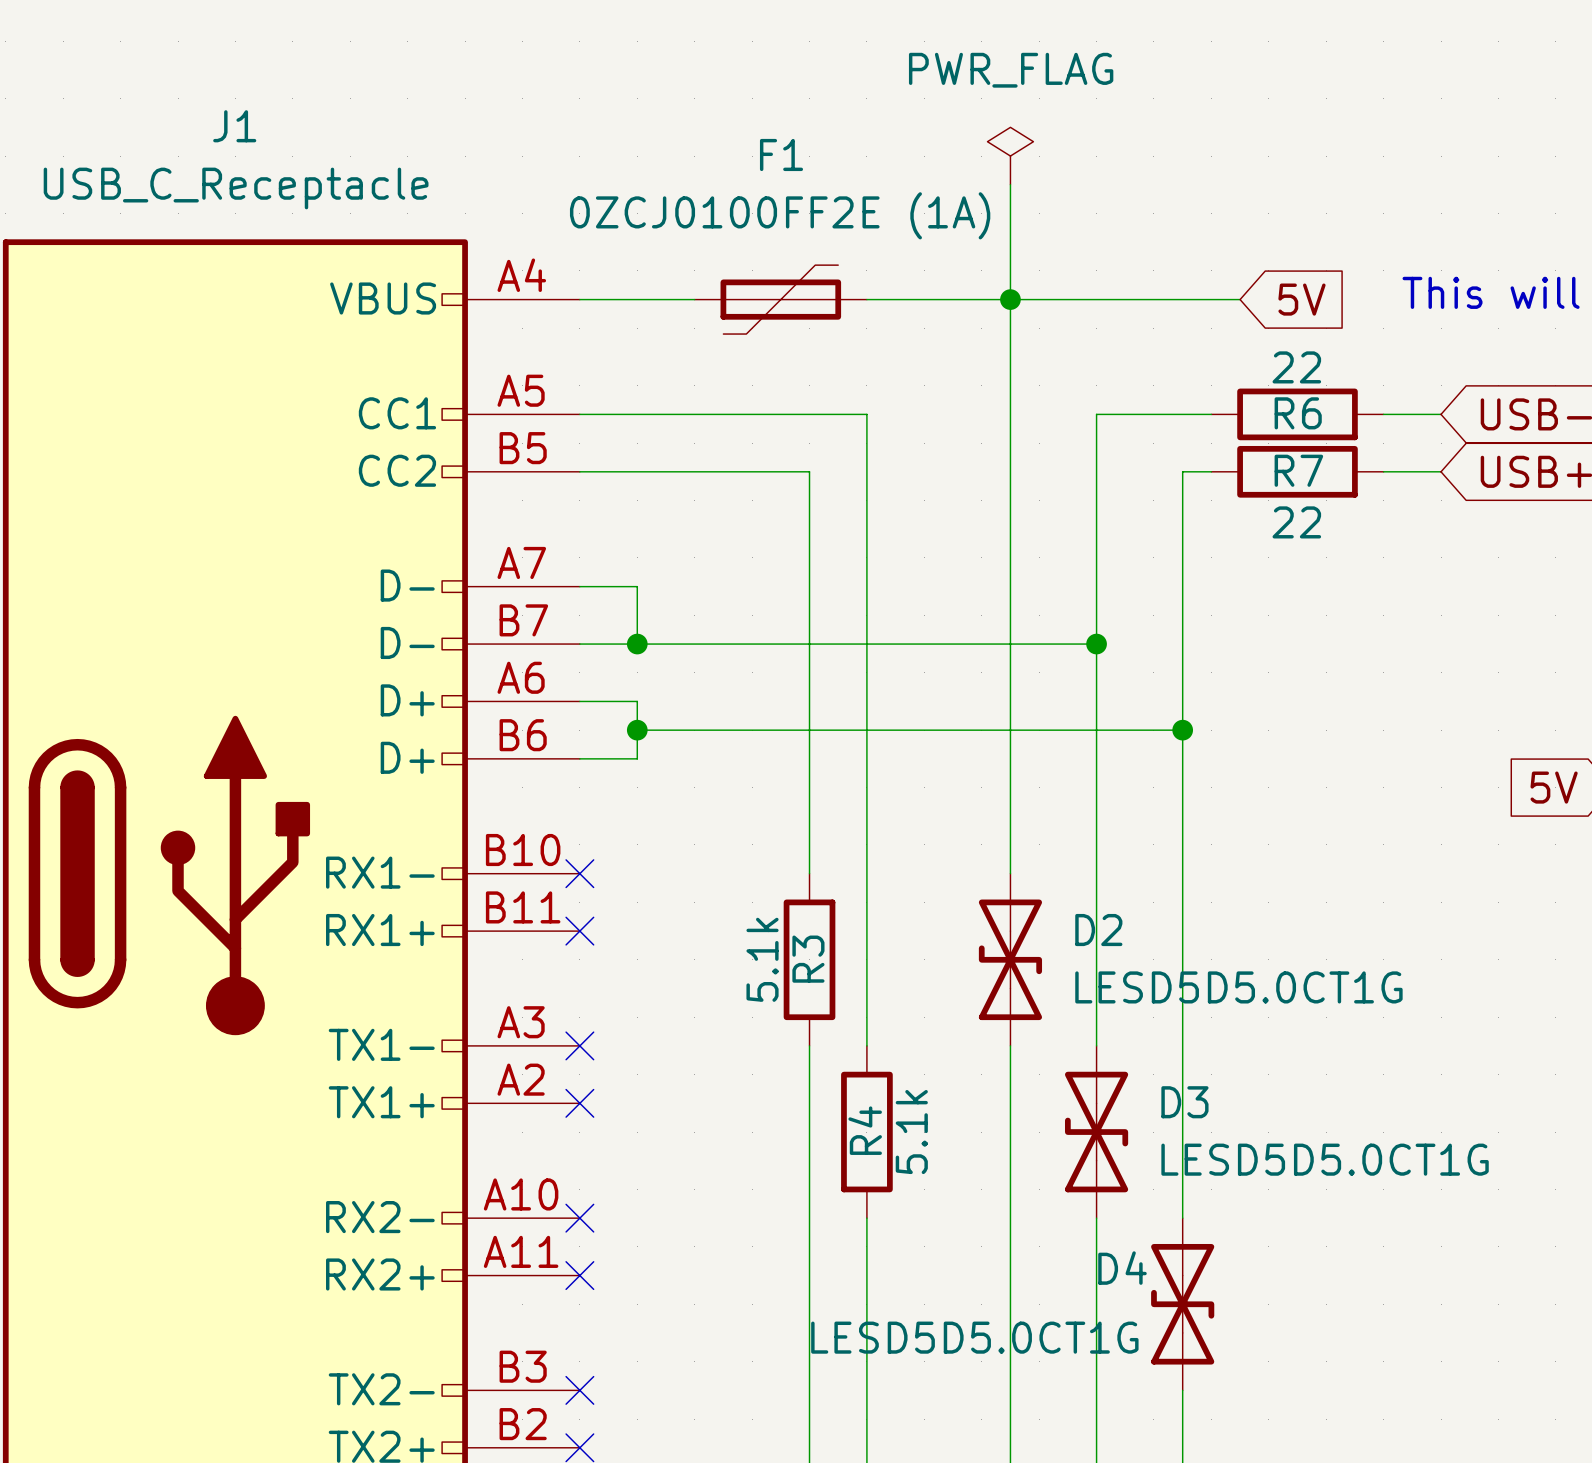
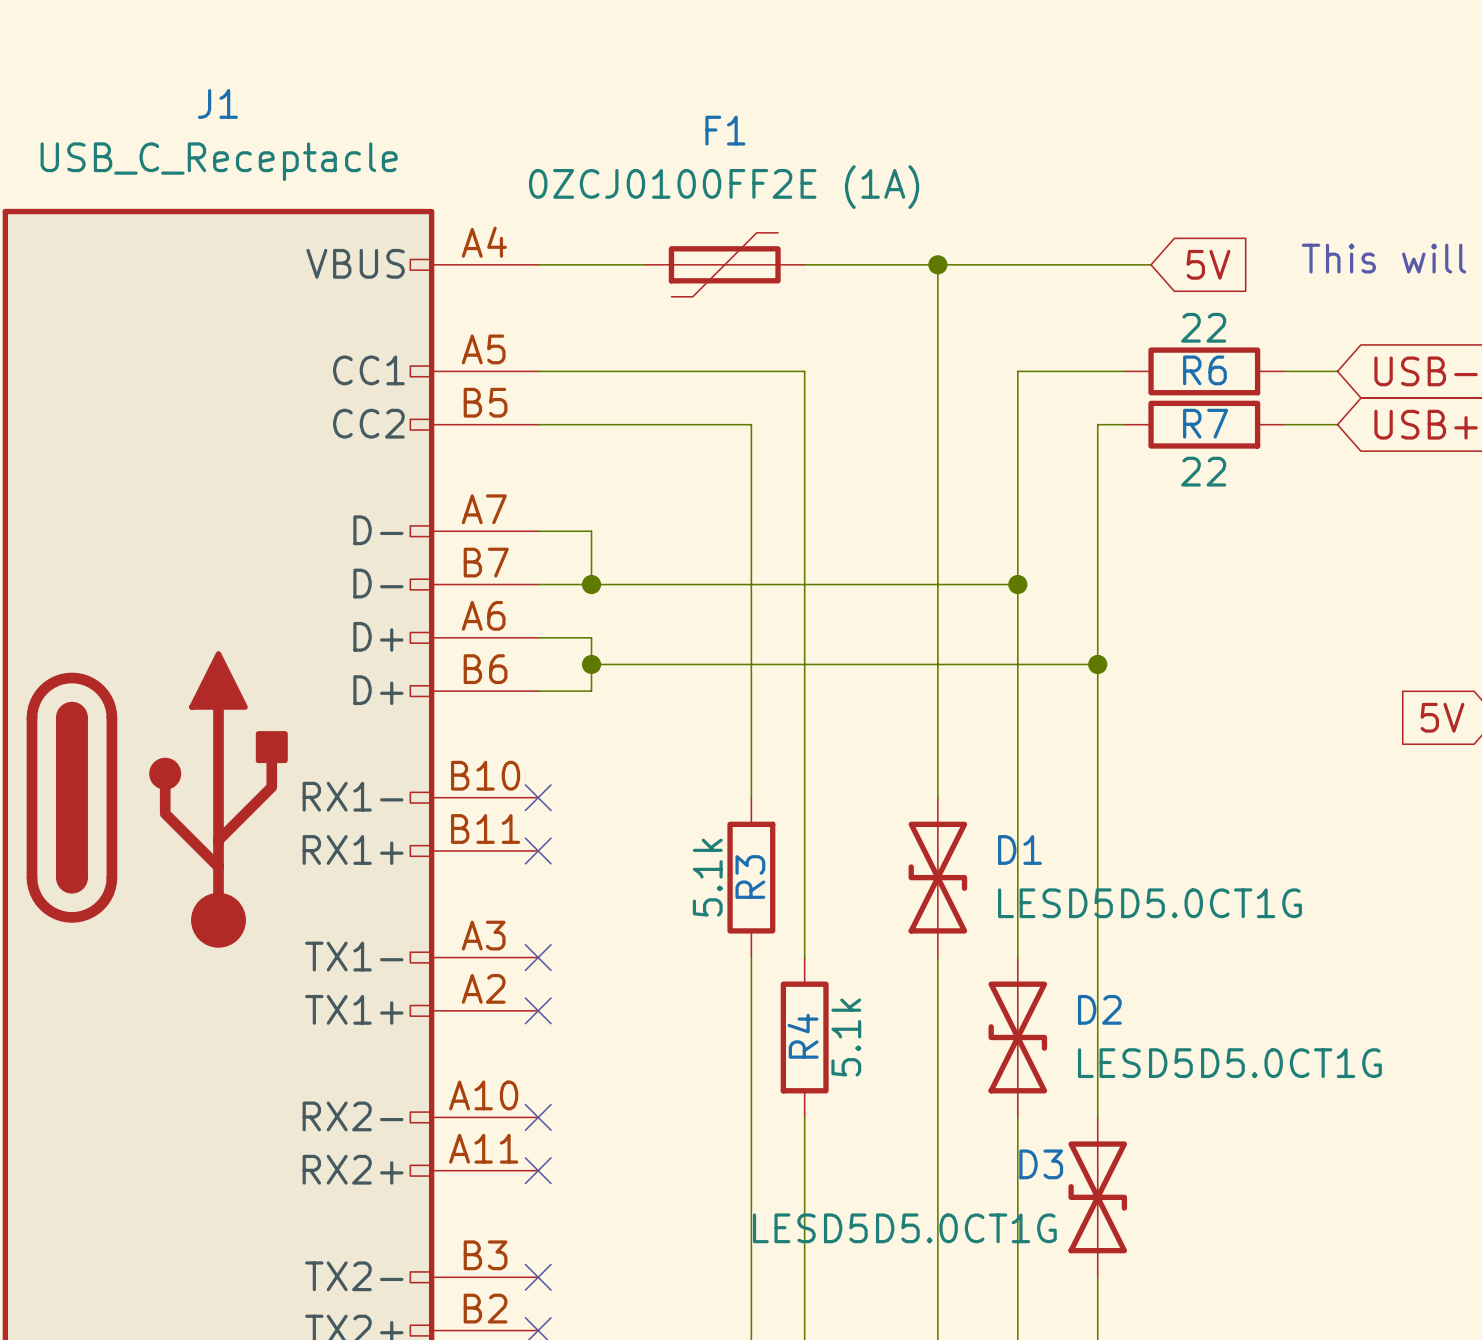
power symbol: PWR_FLAG (1010, 156) -> none
wire: (1010, 184) (1010, 299) -> none
D2 name: D2 (1098, 930) -> D1 (1019, 849)
D3 name: D3 (1184, 1102) -> D2 (1099, 1009)
D4 name: D4 (1122, 1268) -> D3 (1041, 1164)

